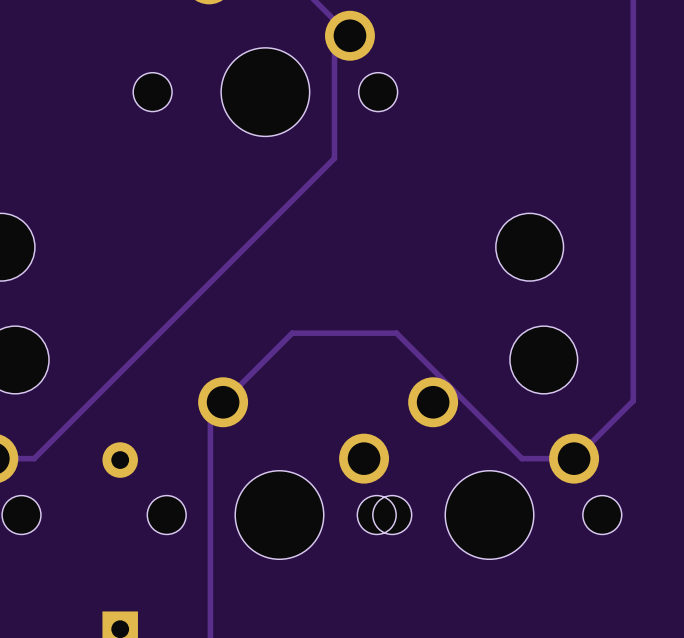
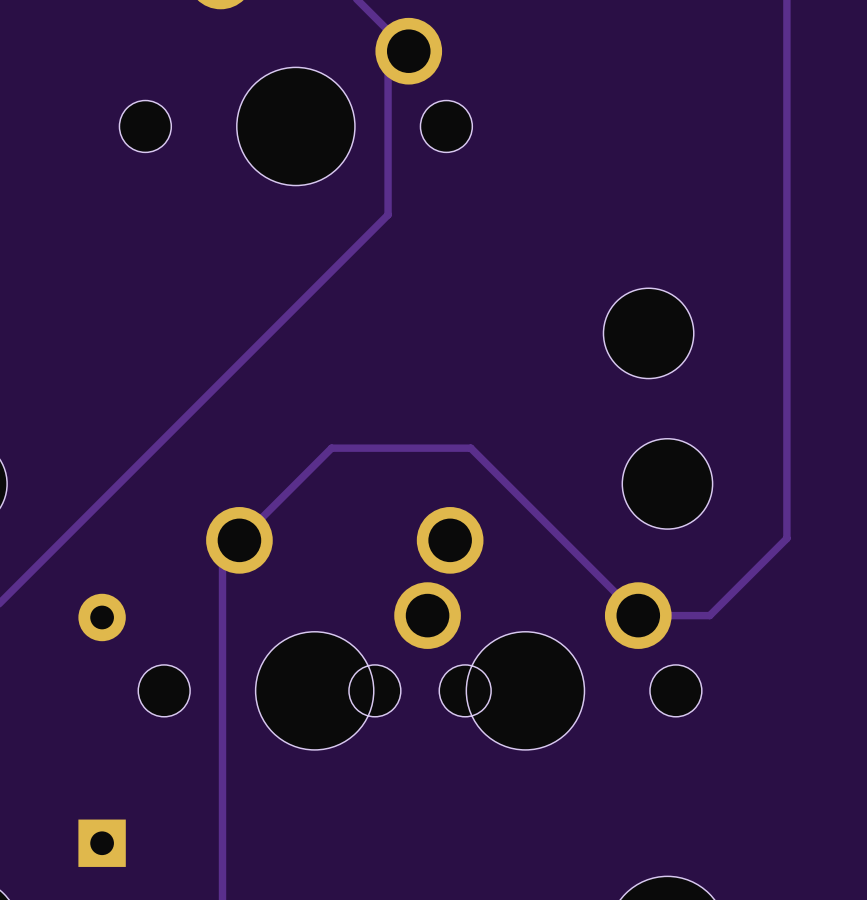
part position: (489, 468) -> (525, 628)

